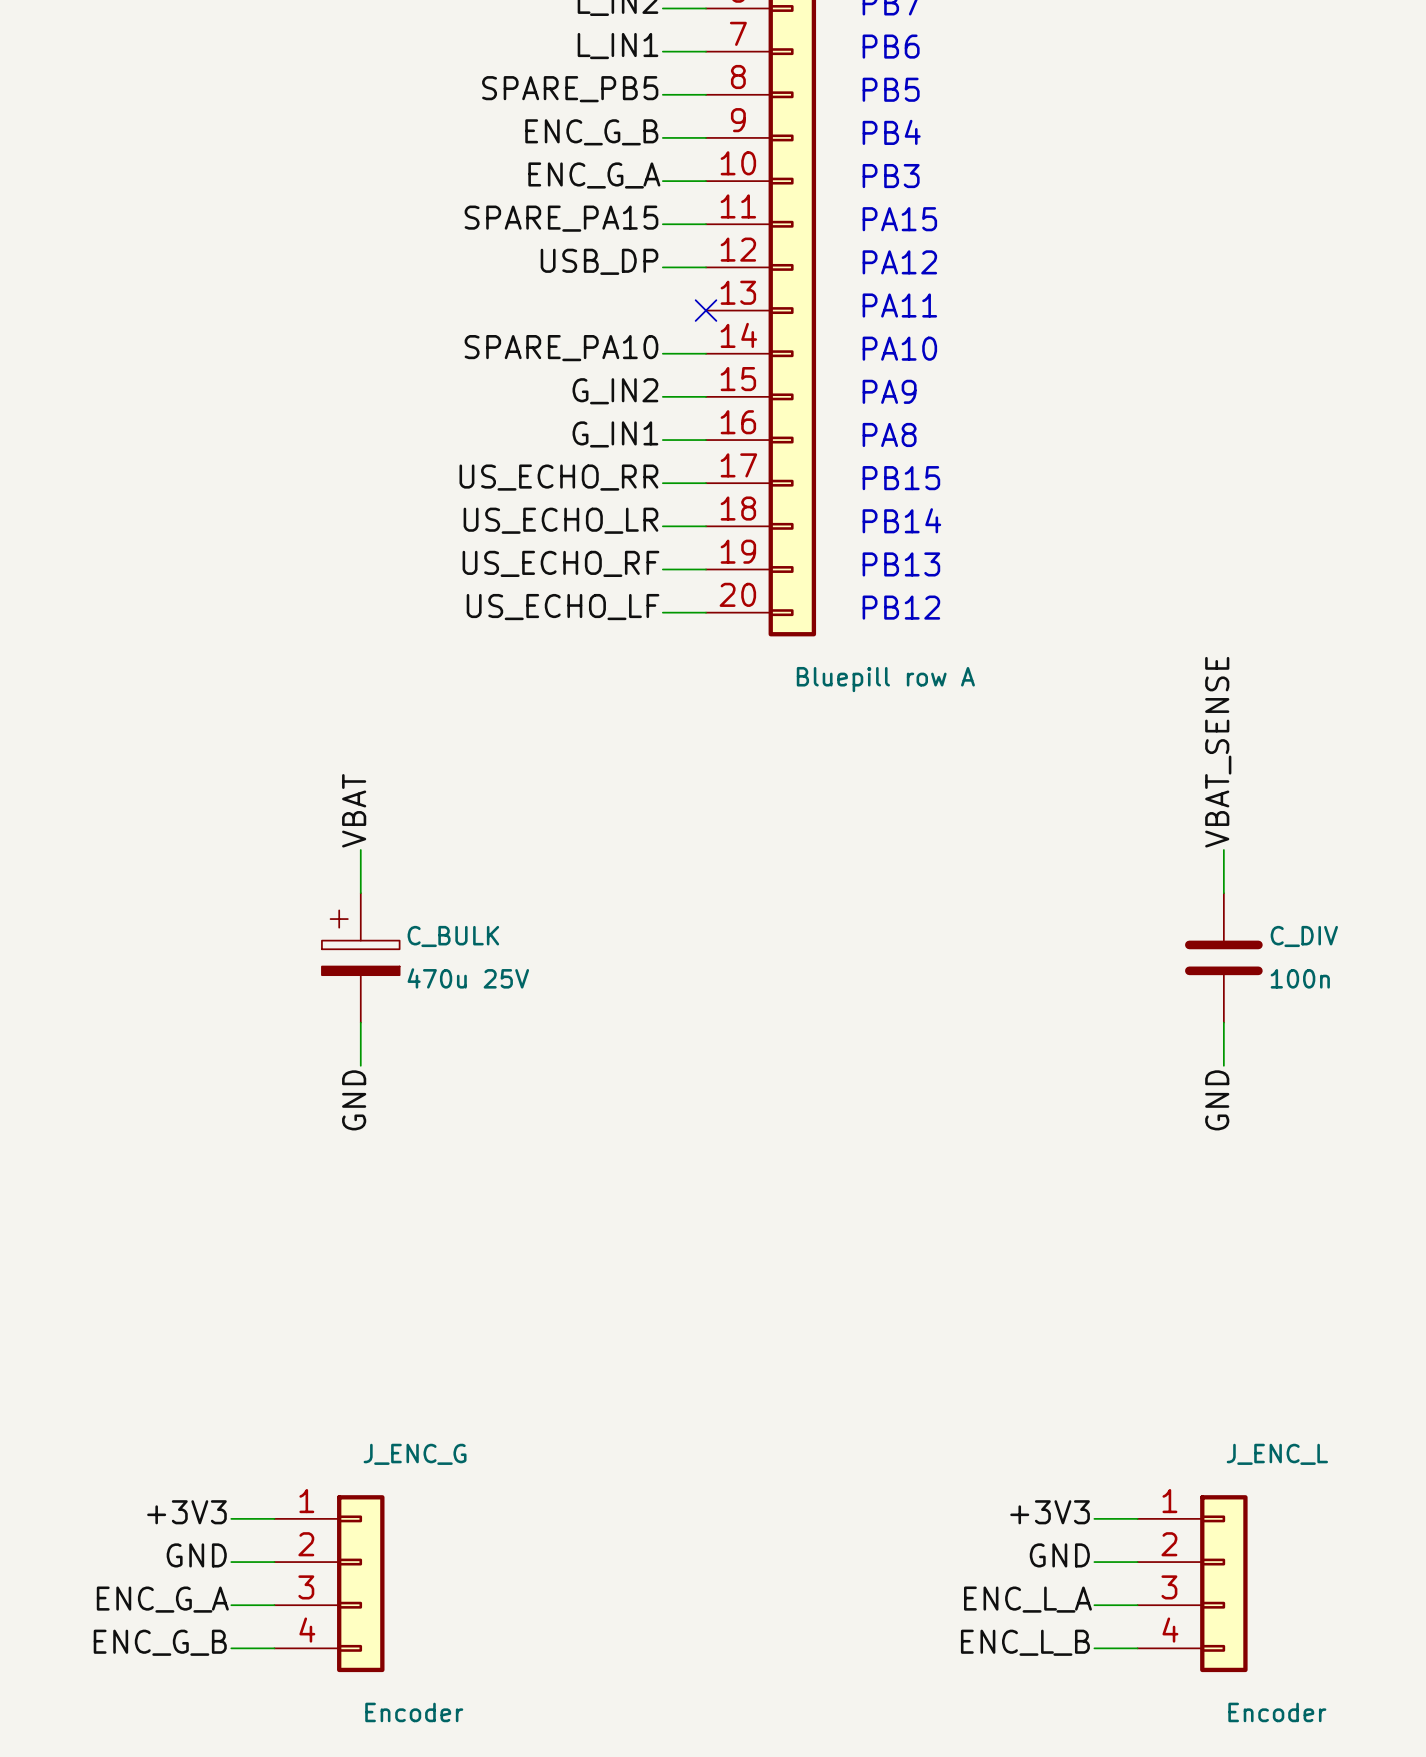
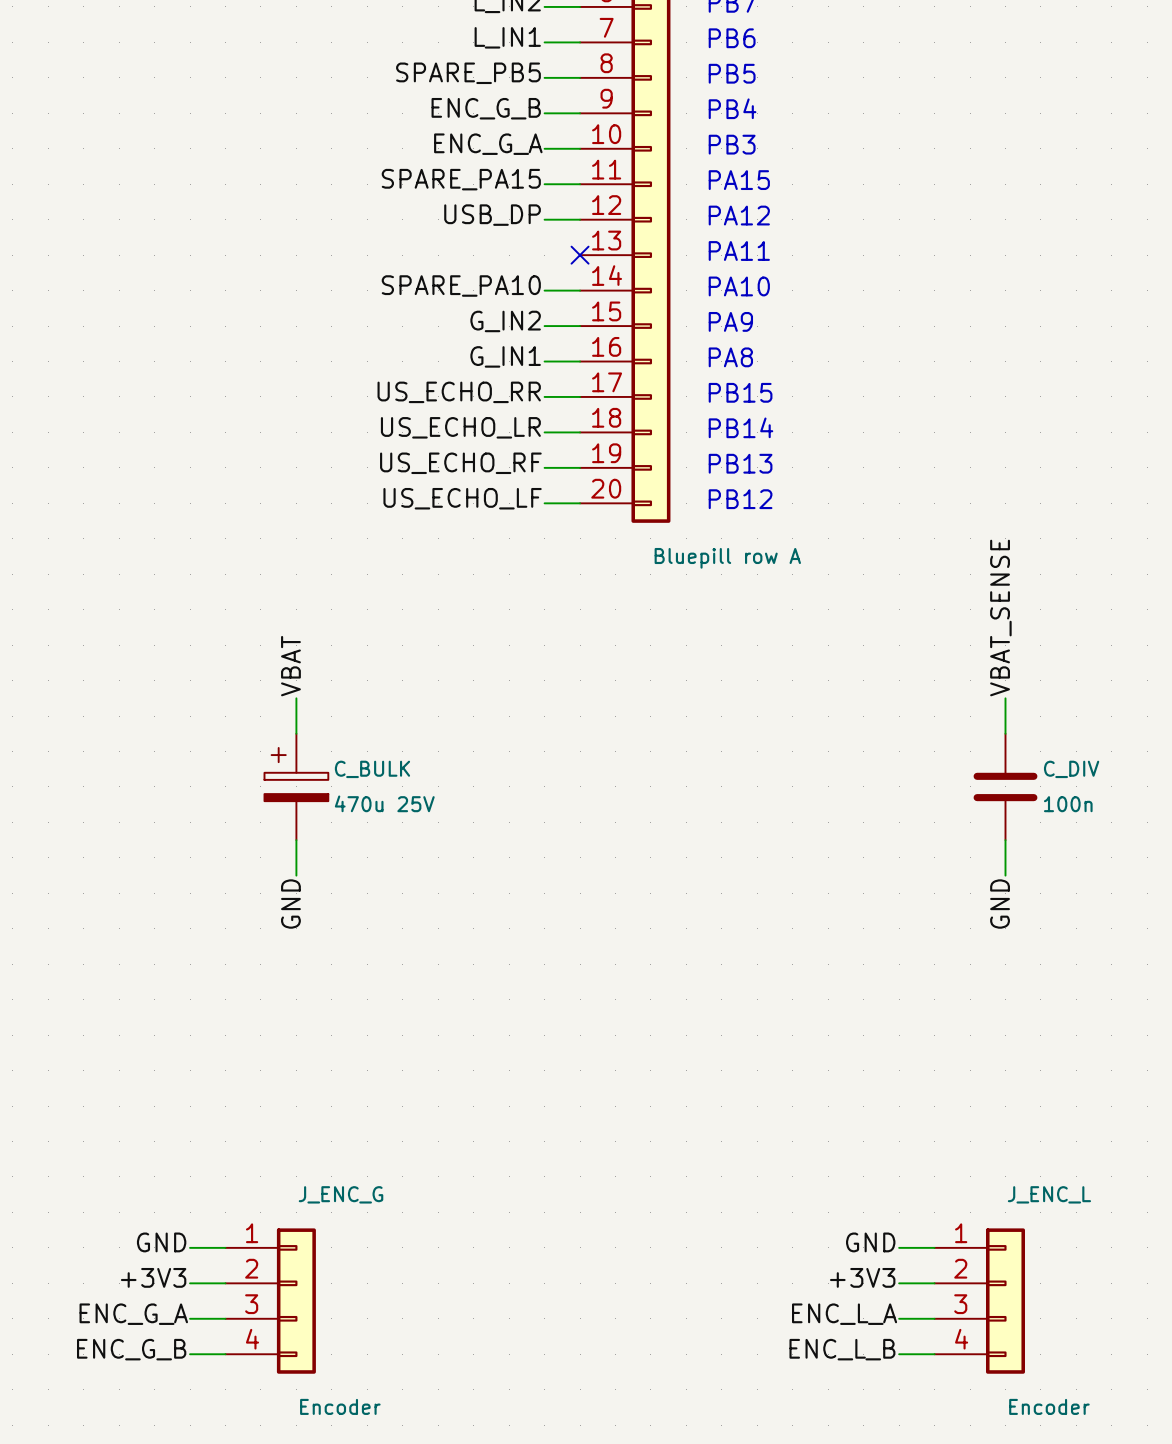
label: +3V3 (186, 1512) -> GND (161, 1242)
label: +3V3 (1050, 1512) -> GND (870, 1242)
label: GND (196, 1555) -> +3V3 (153, 1277)
label: GND (1059, 1555) -> +3V3 (862, 1277)

